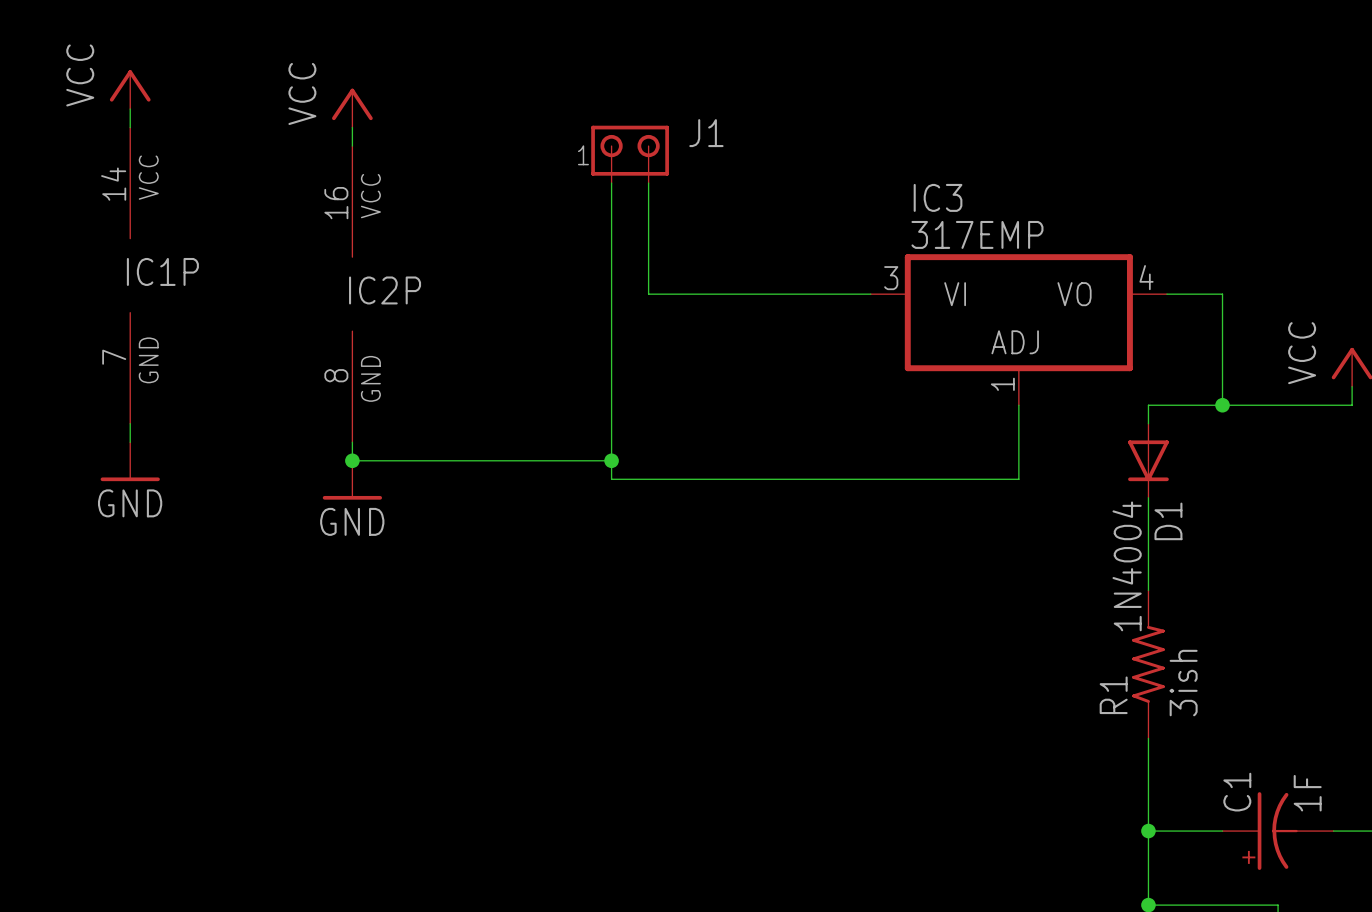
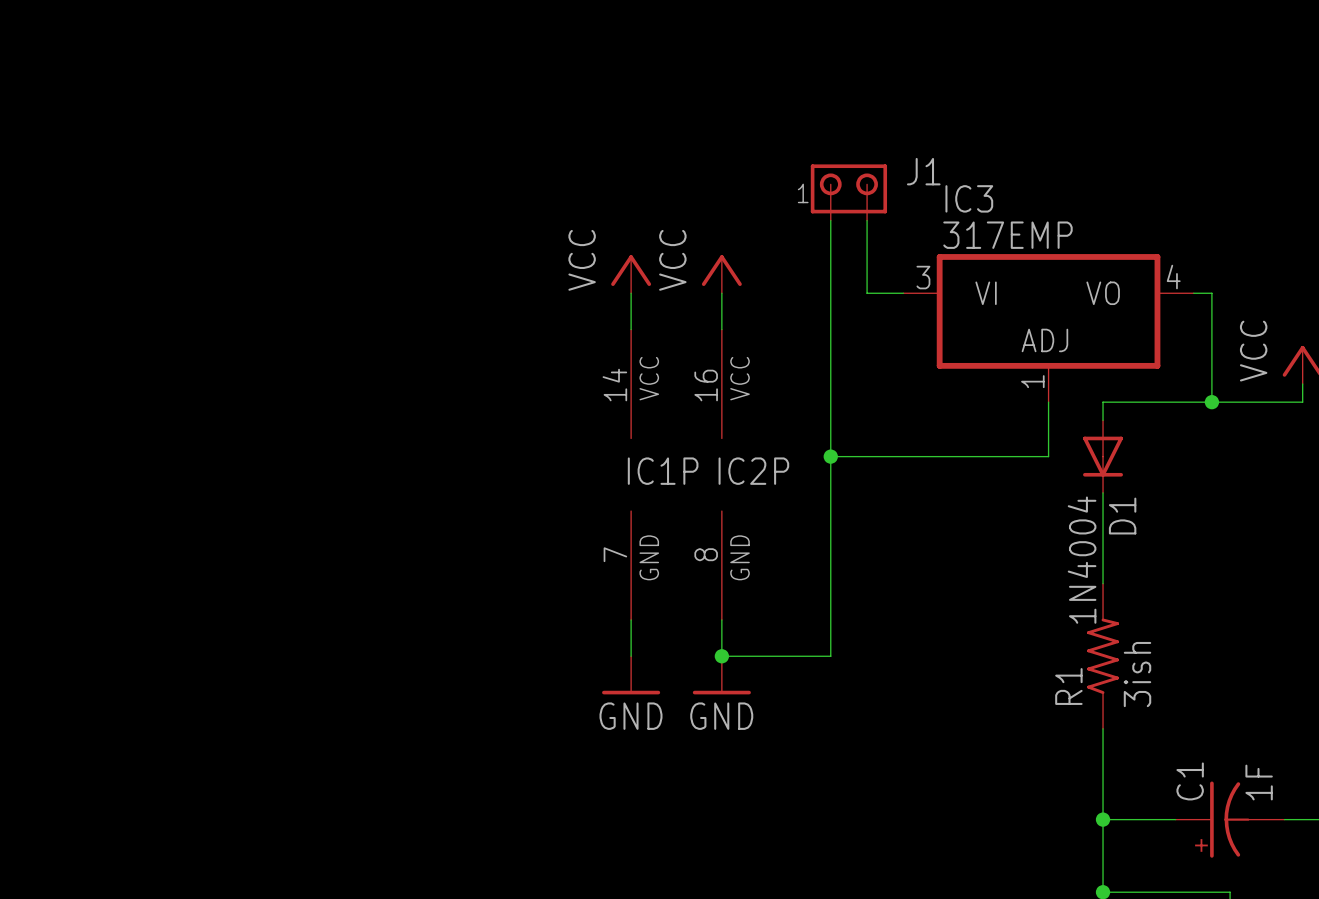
power symbol: VCC (130, 89) -> none
power symbol: VCC (352, 108) -> none
wire: (130, 109) (130, 127) -> none
wire: (352, 127) (352, 146) -> none
J1 position: (630, 154) -> (848, 192)
wire: (611, 183) (611, 479) (1018, 479) (1018, 405) -> none
wire: (648, 183) (648, 294) (870, 294) -> none
wire: none -> (830, 220) (830, 656) (721, 656) (721, 619)
wire: none -> (867, 220) (867, 293) (903, 293)
power symbol: none -> VCC (631, 274)
power symbol: none -> VCC (721, 274)
IC1P position: (130, 275) -> (631, 474)
IC2P position: (352, 294) -> (721, 474)
wire: none -> (631, 293) (631, 329)
wire: none -> (721, 293) (721, 329)
wire: (1166, 294) (1222, 294) (1222, 405) -> none
wire: none -> (1193, 293) (1211, 293) (1211, 402)
IC3 position: (1018, 329) -> (1048, 328)
wire: none -> (1048, 402) (1048, 456) (830, 456)
junction position: (1222, 405) -> (1211, 402)
wire: (130, 423) (130, 442) -> none
wire: (352, 442) (352, 460) (611, 460) -> none
junction: (352, 460) -> none
junction: (611, 460) -> none
junction: none -> (830, 456)
power symbol: GND (130, 461) -> none
power symbol: GND (352, 480) -> none
wire: none -> (631, 619) (631, 656)
junction: none -> (721, 656)
power symbol: none -> GND (631, 675)
power symbol: none -> GND (721, 675)

